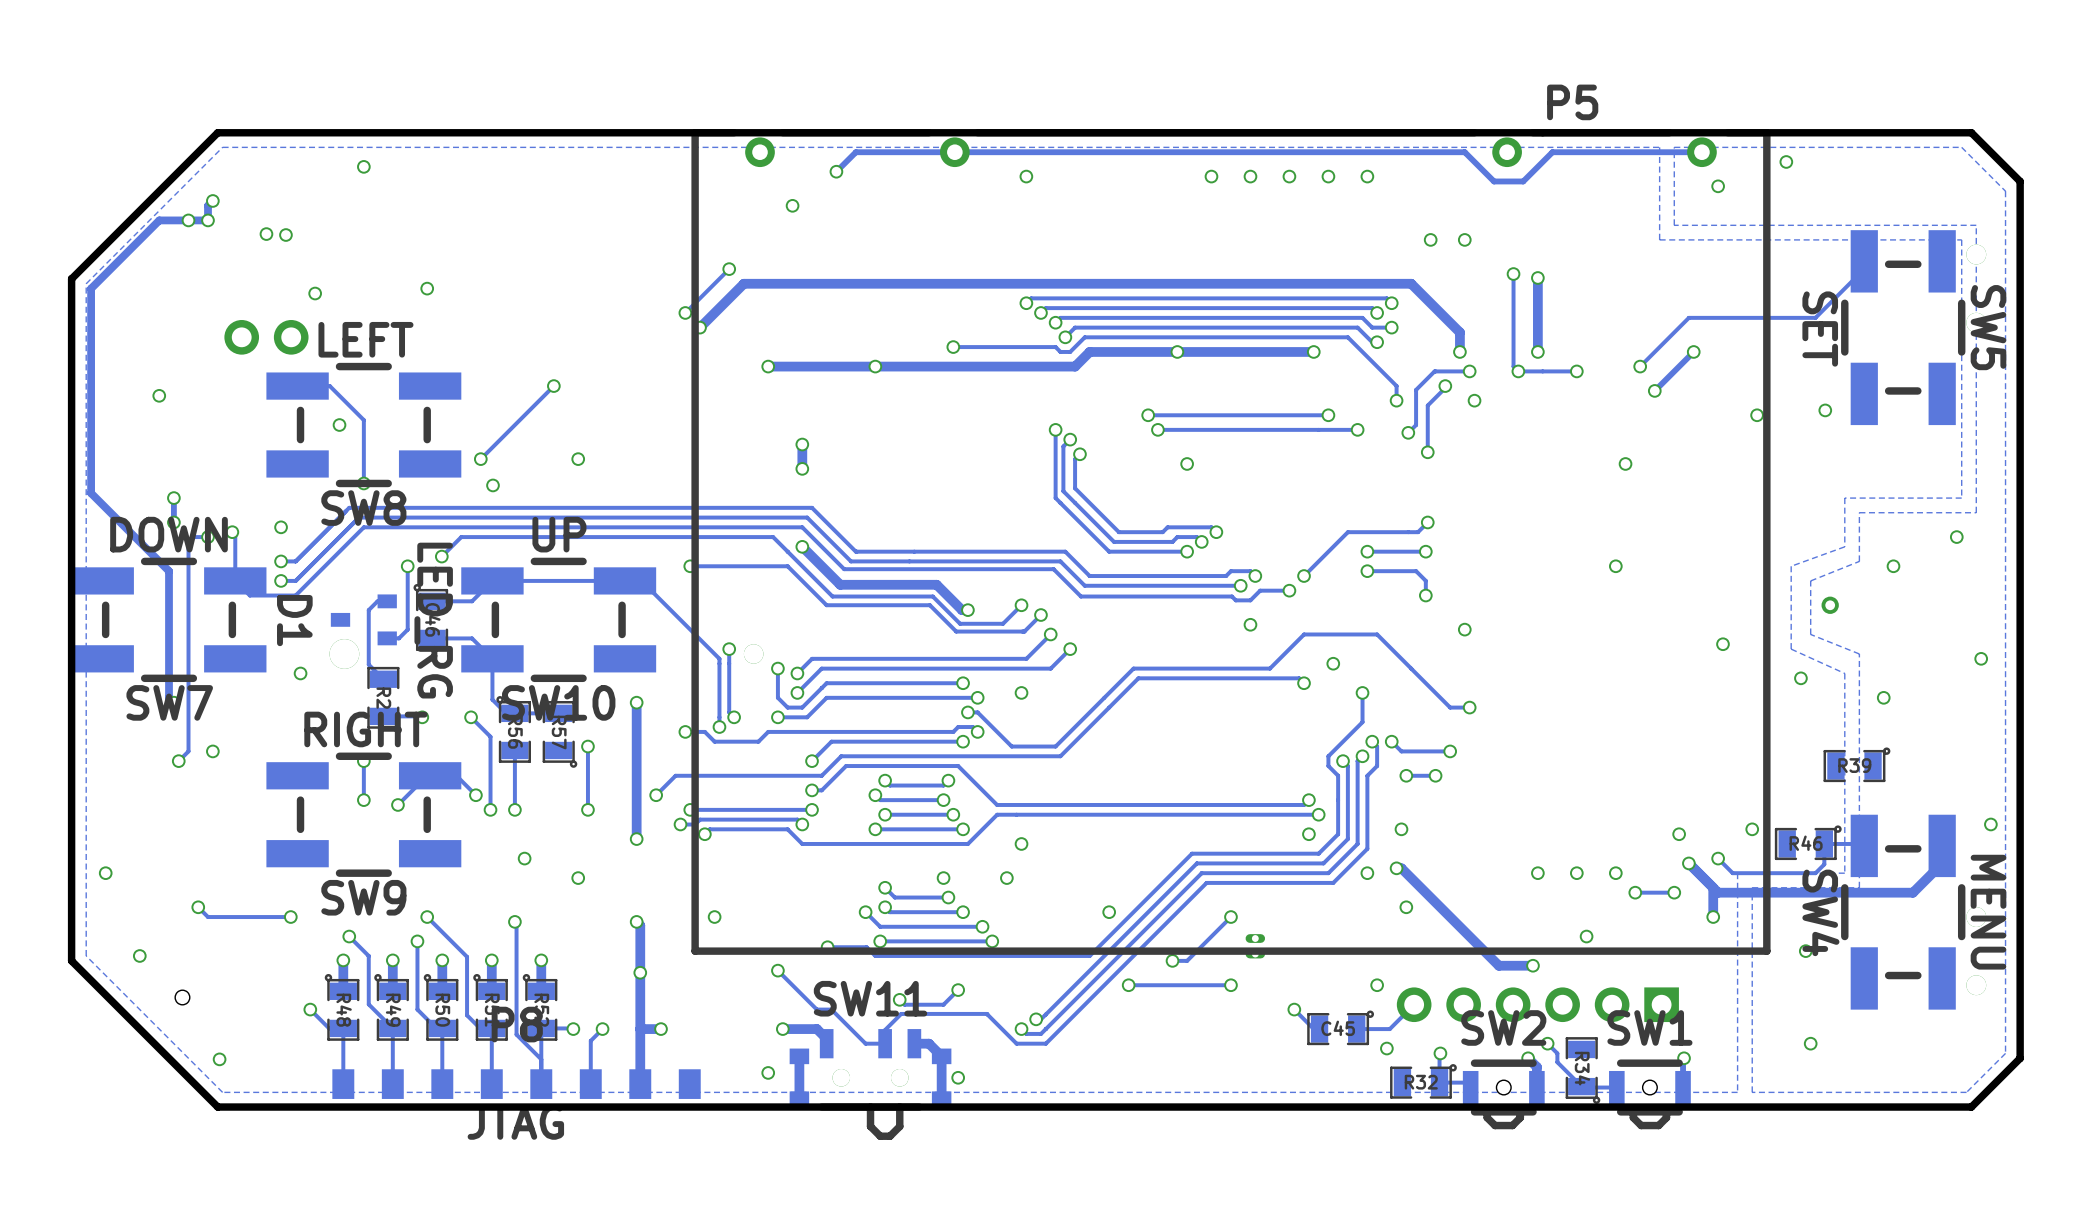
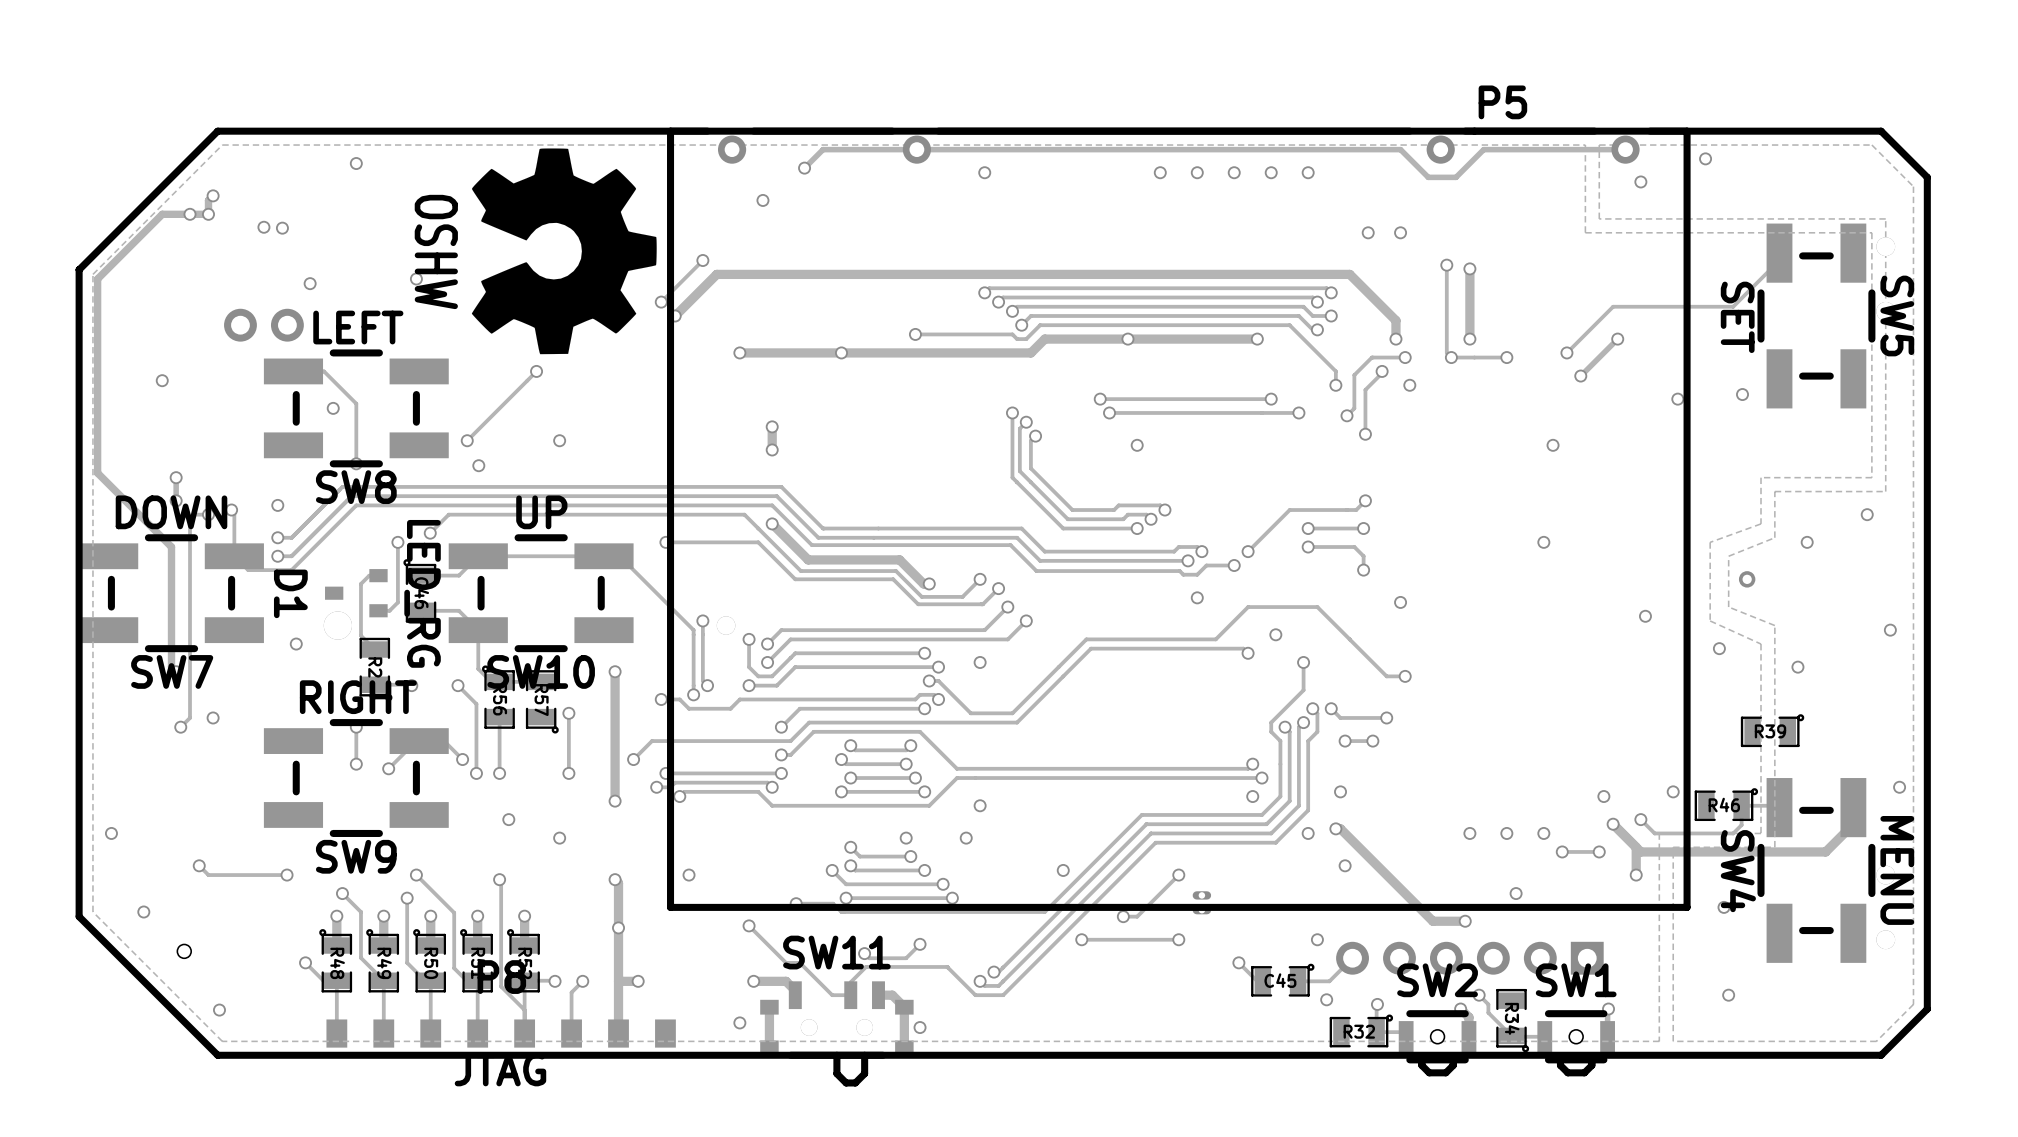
drawing: none -> [471, 148, 657, 355]
text: none -> OSHW (436, 251)

